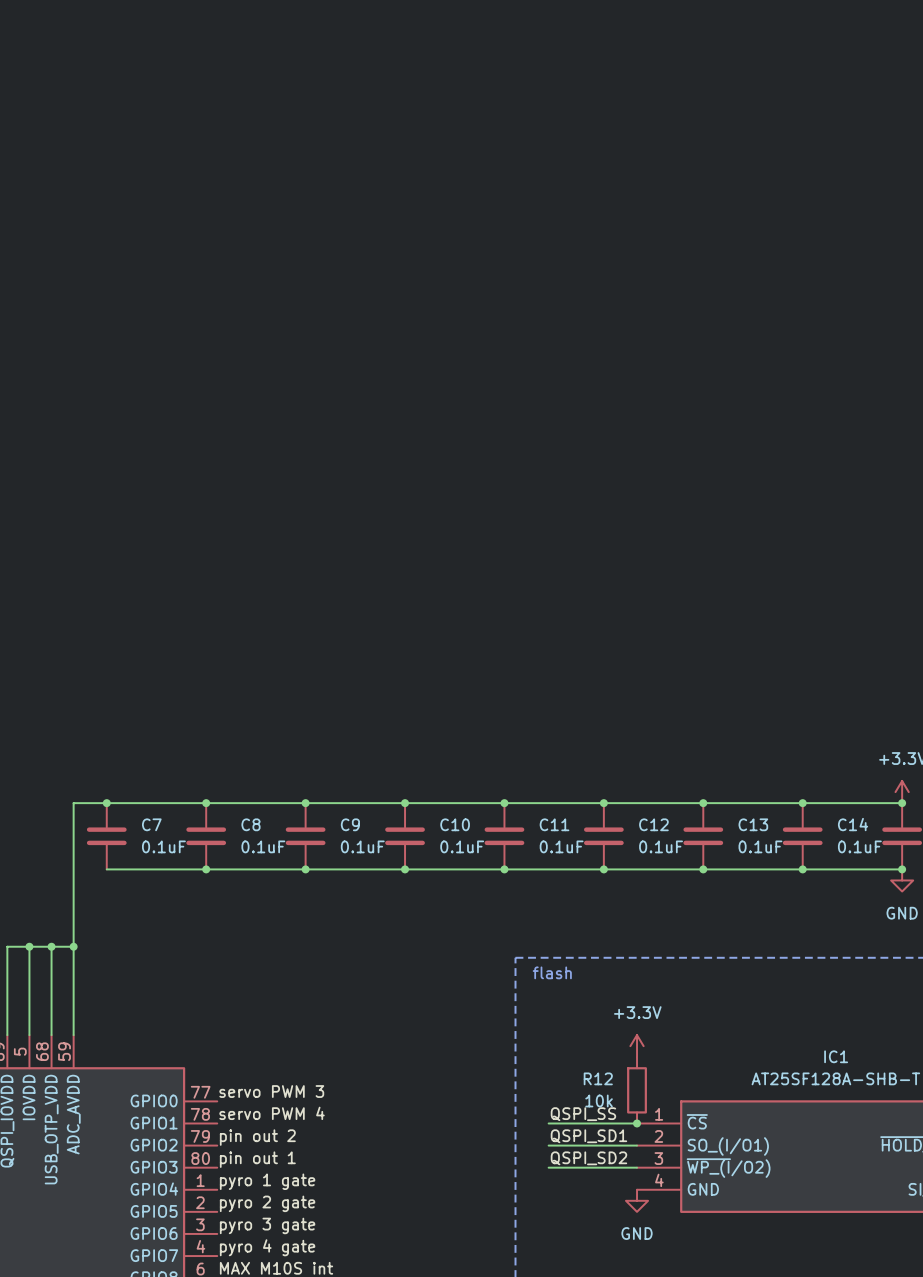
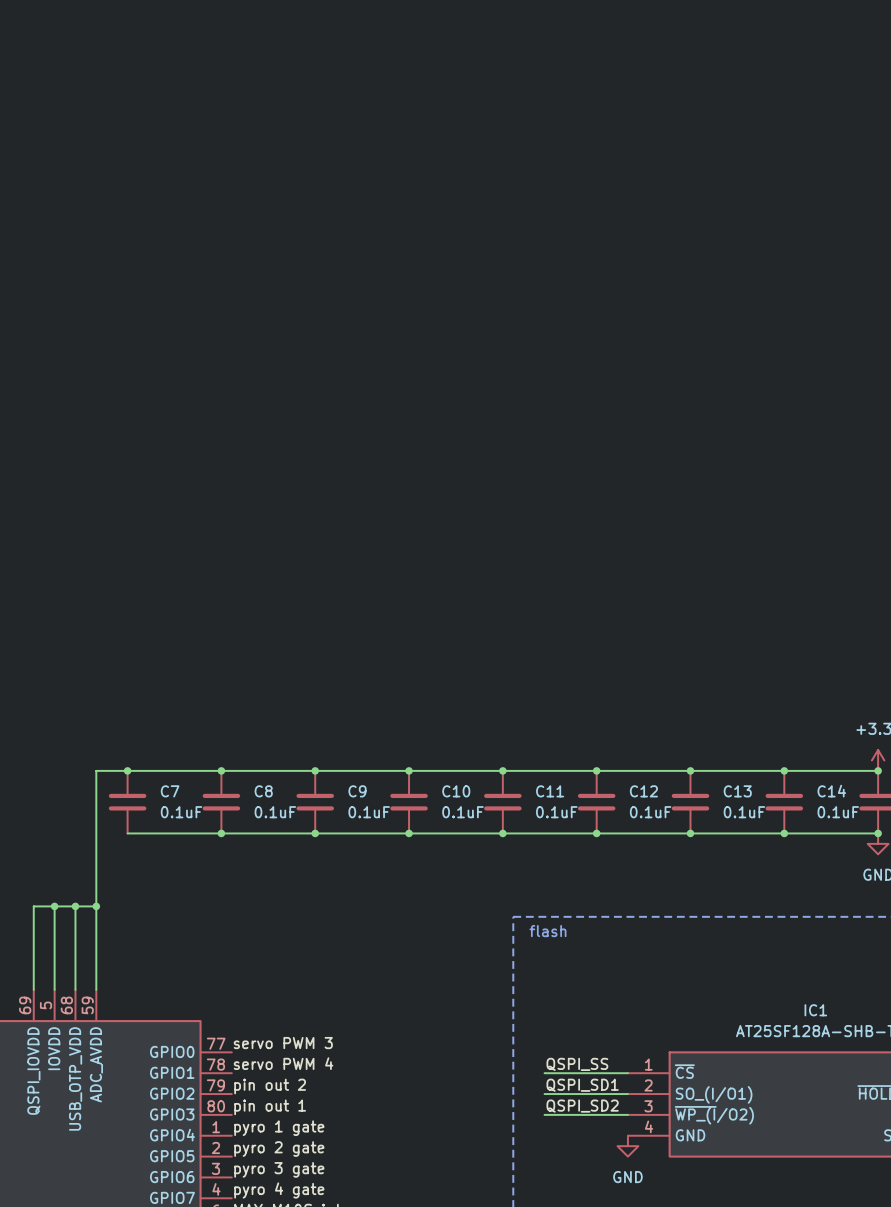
power symbol: +3.3V (637, 1046) -> none
R12: 10k (637, 1090) -> none
junction: (637, 1123) -> none

